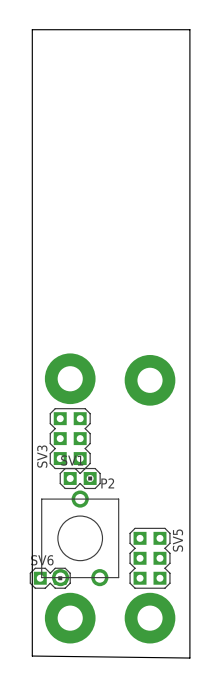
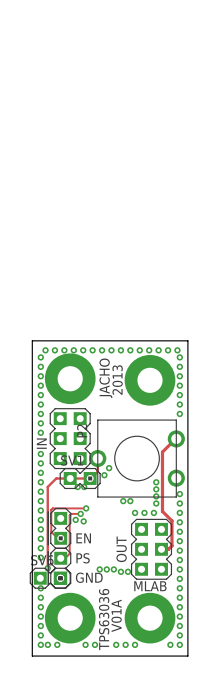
board edge: (32, 340) (32, 29) (189, 29) (189, 658) (32, 656) -> (32, 340) (187, 340) (187, 656) (32, 656)
via: none -> (45, 350)
via: none -> (54, 350)
via: none -> (64, 350)
via: none -> (73, 350)
via: none -> (83, 350)
via: none -> (92, 350)
via: none -> (102, 350)
via: none -> (111, 350)
via: none -> (120, 350)
via: none -> (130, 350)
via: none -> (139, 350)
via: none -> (149, 350)
via: none -> (158, 350)
via: none -> (168, 350)
via: none -> (177, 350)
via: none -> (40, 357)
via: none -> (179, 357)
via: none -> (40, 366)
via: none -> (179, 366)
via: none -> (40, 376)
via: none -> (179, 376)
text: none -> JACHO (105, 378)
text: none -> 2013 (117, 380)
via: none -> (40, 385)
via: none -> (179, 385)
via: none -> (40, 395)
via: none -> (179, 395)
via: none -> (40, 404)
via: none -> (179, 404)
via: none -> (40, 413)
via: none -> (179, 413)
via: none -> (40, 423)
via: none -> (40, 432)
track: none -> (176, 438) (162, 452) (162, 511) (171, 520) (171, 545) (168, 549) (161, 549)
text: none -> IN (41, 443)
via: none -> (40, 454)
SV3 name: SV3 (42, 456) -> none
track: none -> (97, 458) (97, 471) (91, 478) (56, 478) (47, 486) (47, 568)
via: none -> (40, 463)
via: none -> (109, 468)
via: none -> (40, 472)
via: none -> (104, 475)
via: none -> (40, 482)
via: none -> (156, 482)
via: none -> (77, 486)
via: none -> (84, 486)
via: none -> (156, 489)
via: none -> (40, 491)
via: none -> (179, 494)
via: none -> (156, 496)
via: none -> (40, 501)
via: none -> (123, 501)
via: none -> (130, 501)
via: none -> (156, 503)
via: none -> (179, 503)
track: none -> (86, 508) (51, 509) (51, 531) (57, 538) (60, 538)
via: none -> (86, 508)
via: none -> (40, 510)
line: none -> (48, 511) (48, 544)
via: none -> (135, 512)
via: none -> (144, 512)
via: none -> (153, 512)
via: none -> (179, 512)
track: none -> (80, 513) (69, 515) (69, 553) (65, 557) (60, 557)
via: none -> (80, 513)
via: none -> (40, 519)
via: none -> (75, 519)
via: none -> (83, 521)
via: none -> (179, 522)
part: none -> (60, 528)
via: none -> (40, 529)
via: none -> (179, 531)
via: none -> (40, 538)
P2 rotation: 0° (80, 538) -> 90° counterclockwise (137, 458)
P2 position: (80, 538) -> (137, 458)
text: none -> EN (83, 538)
via: none -> (179, 541)
via: none -> (40, 548)
text: none -> OUT (121, 549)
part: none -> (151, 549)
via: none -> (179, 550)
line: none -> (48, 551) (48, 584)
via: none -> (40, 557)
text: none -> PS (83, 558)
SV5: (150, 558) -> none
via: none -> (179, 560)
via: none -> (47, 568)
part: none -> (60, 568)
via: none -> (99, 569)
via: none -> (106, 569)
via: none -> (113, 569)
via: none -> (179, 569)
via: none -> (120, 571)
via: none -> (127, 571)
text: none -> GND (89, 577)
via: none -> (179, 578)
text: none -> MLAB (150, 586)
via: none -> (40, 588)
via: none -> (179, 588)
via: none -> (40, 597)
via: none -> (179, 597)
via: none -> (40, 607)
via: none -> (179, 607)
text: none -> V01A (116, 615)
via: none -> (40, 616)
via: none -> (179, 616)
text: none -> TPS63036 (104, 619)
via: none -> (40, 626)
via: none -> (179, 626)
via: none -> (40, 635)
via: none -> (179, 635)
via: none -> (40, 644)
via: none -> (47, 644)
via: none -> (57, 644)
via: none -> (85, 644)
via: none -> (94, 644)
via: none -> (116, 644)
via: none -> (125, 644)
via: none -> (135, 644)
via: none -> (170, 644)
via: none -> (179, 644)

